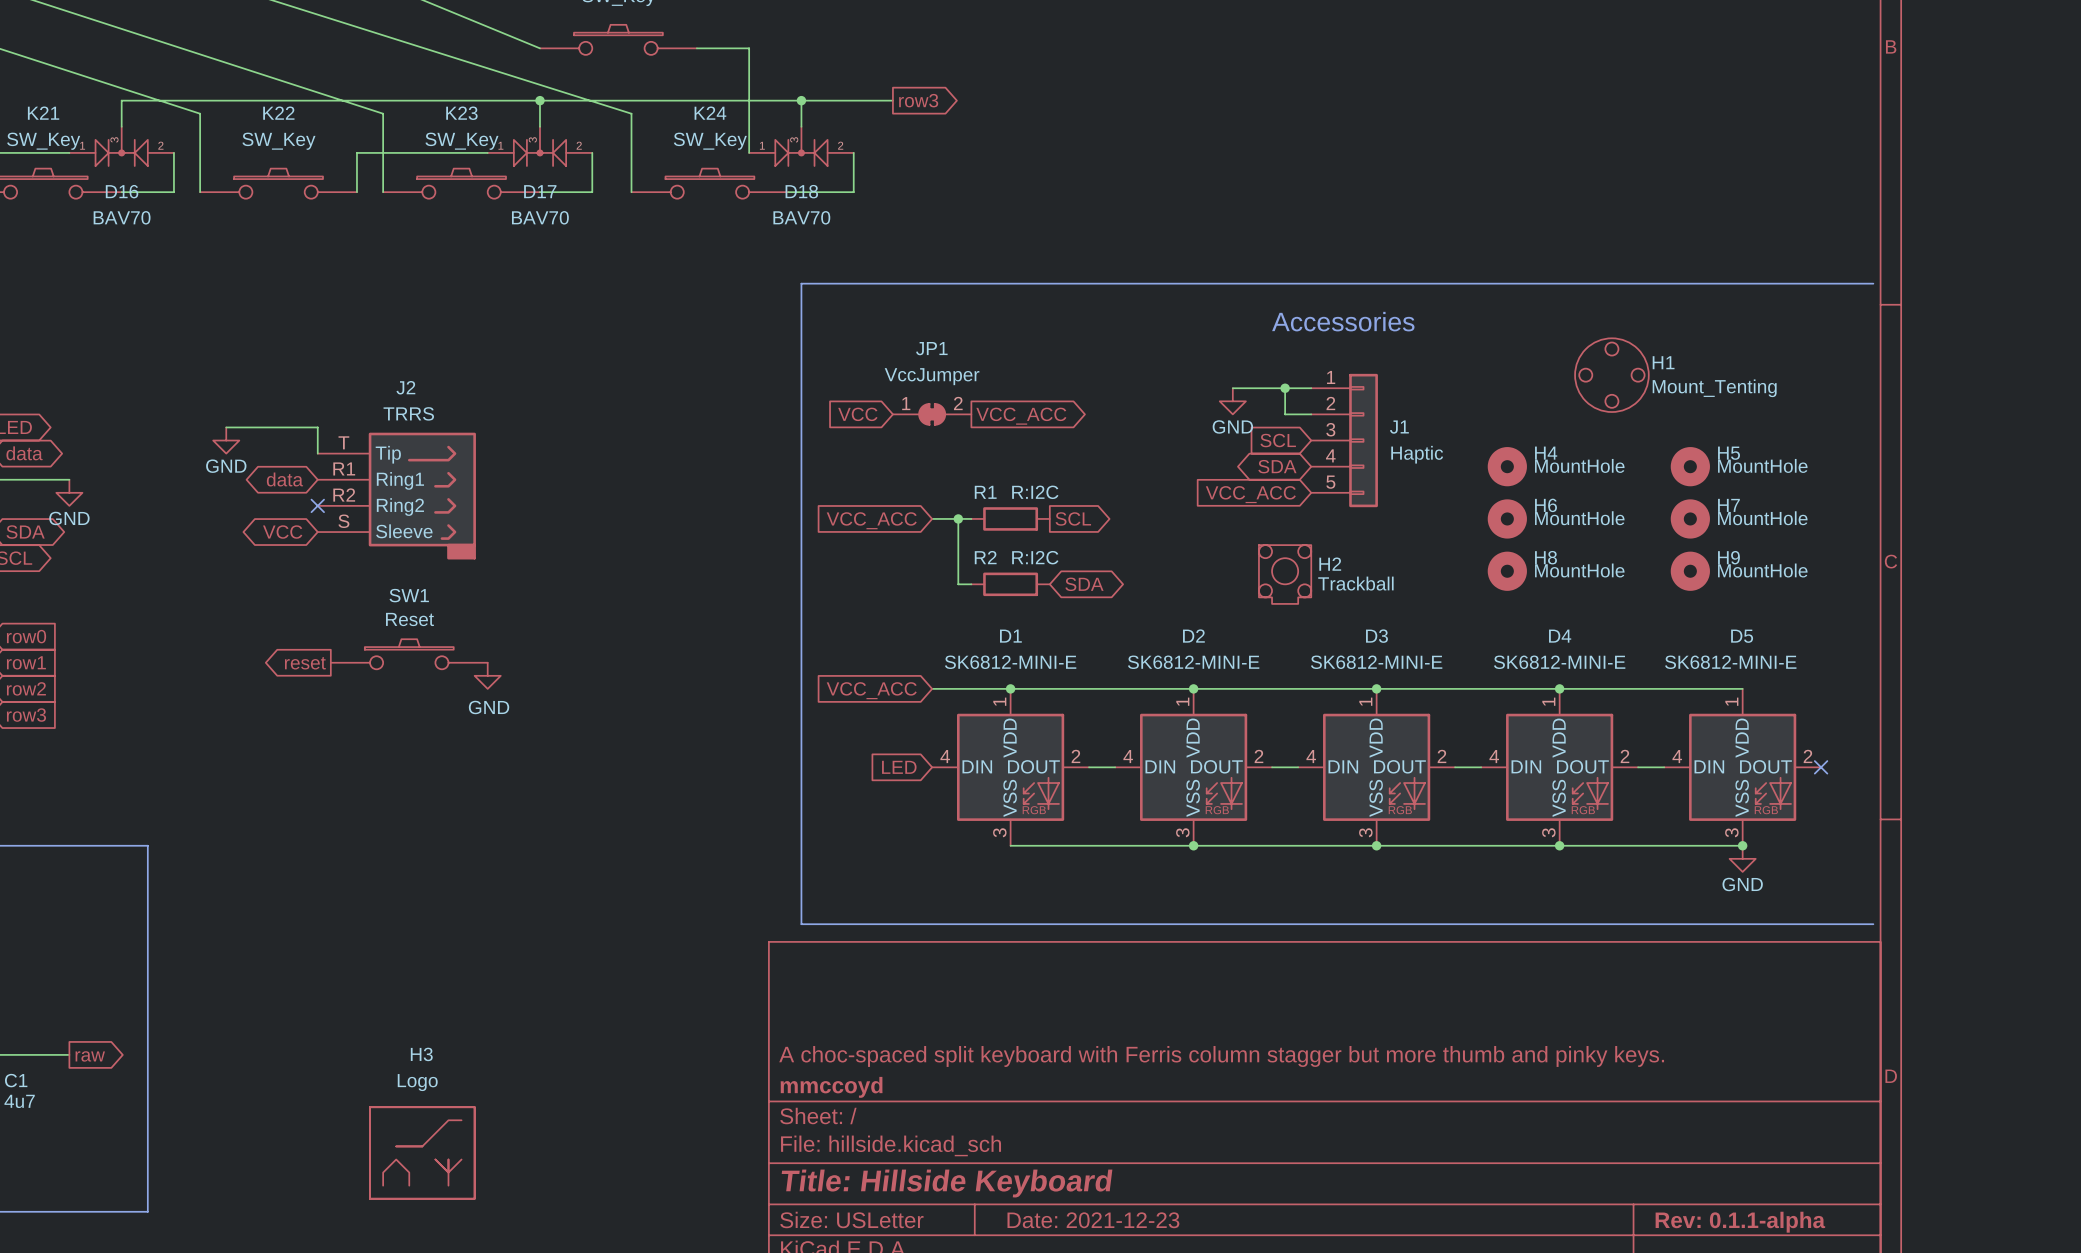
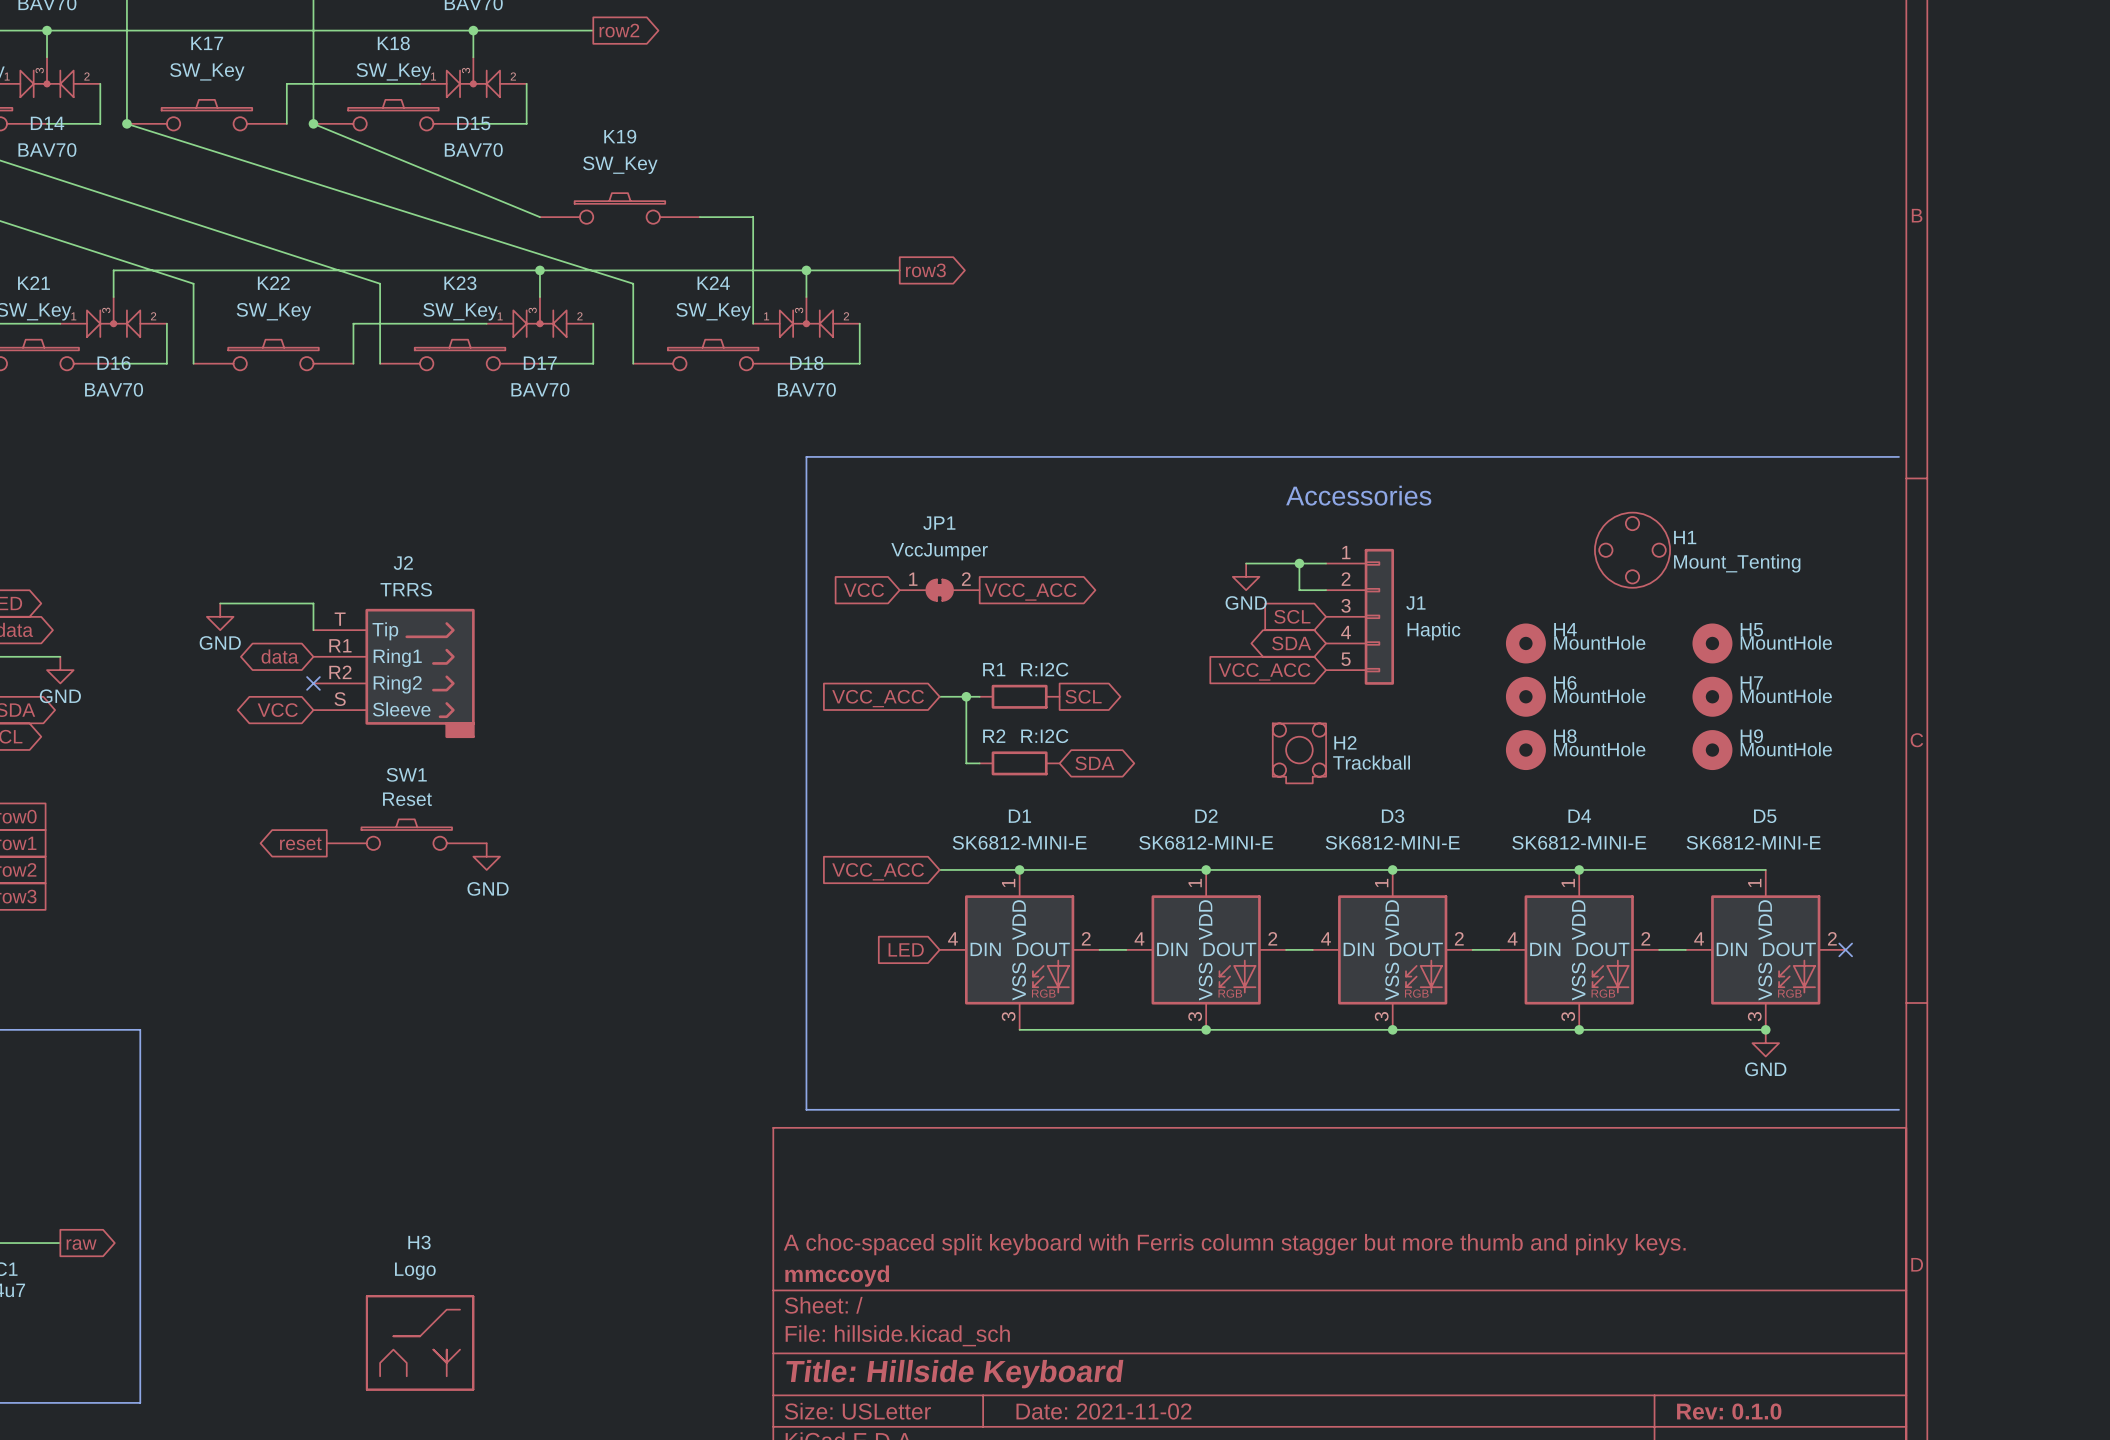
title block: Date: 2021-12-23 (1093, 1220) -> Date: 2021-11-02 (1103, 1411)
title block: Rev: 0.1.1-alpha (1740, 1222) -> Rev: 0.1.0 (1729, 1411)

